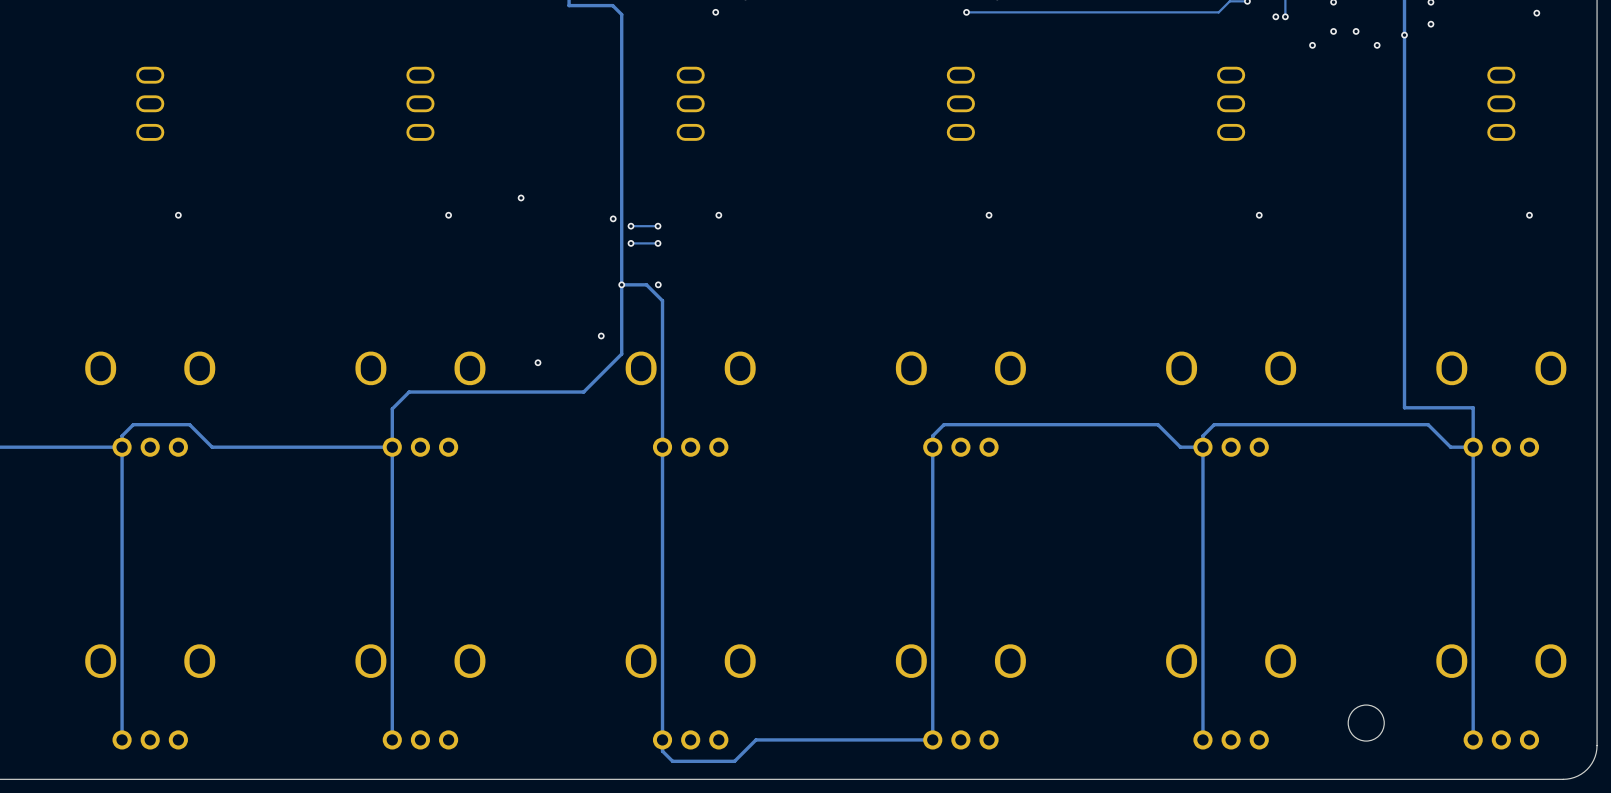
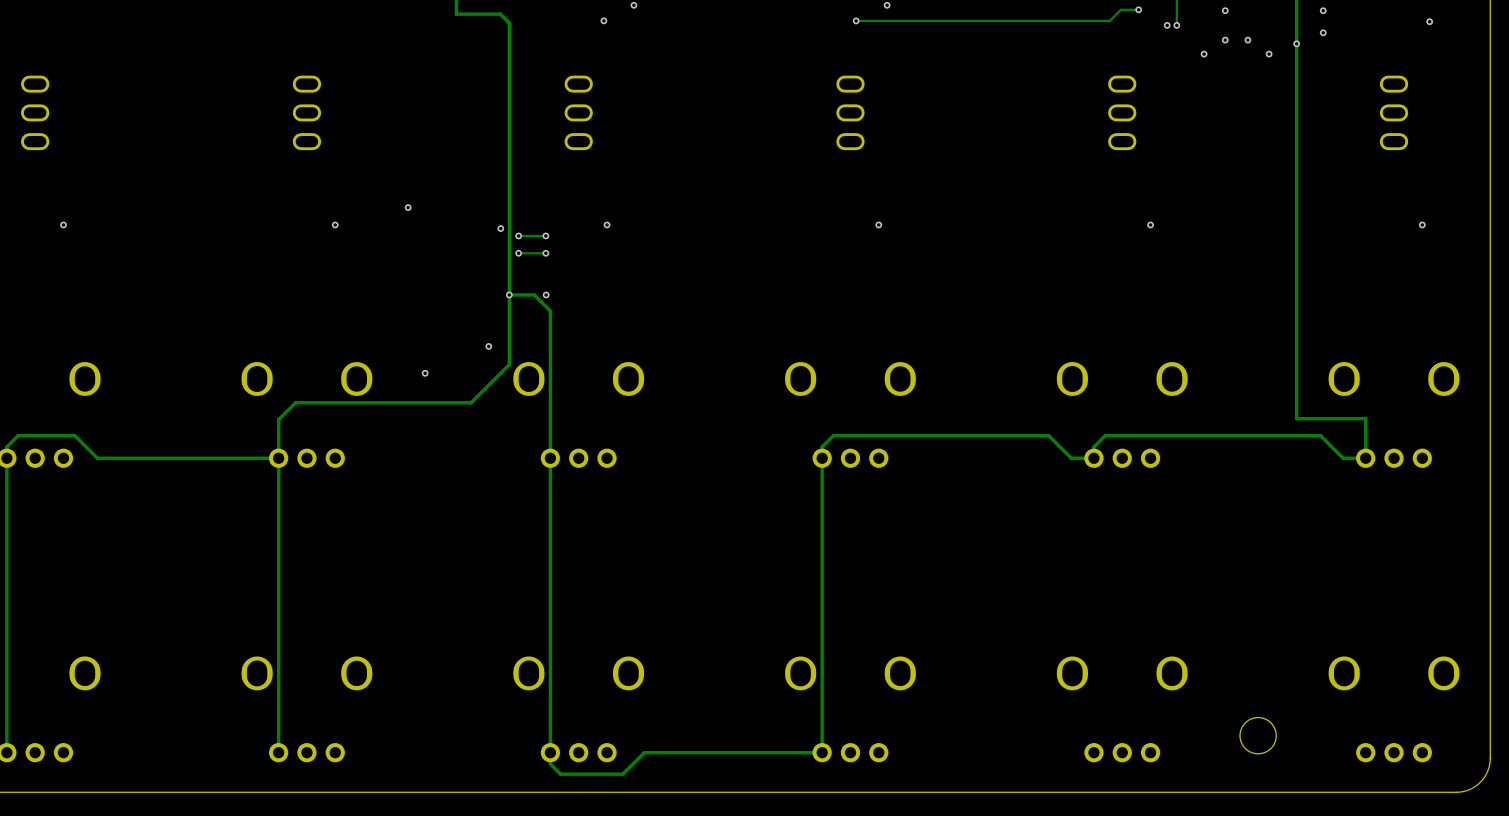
track: (1202, 447) (1202, 739) -> none
track: (1473, 447) (1473, 739) -> none

